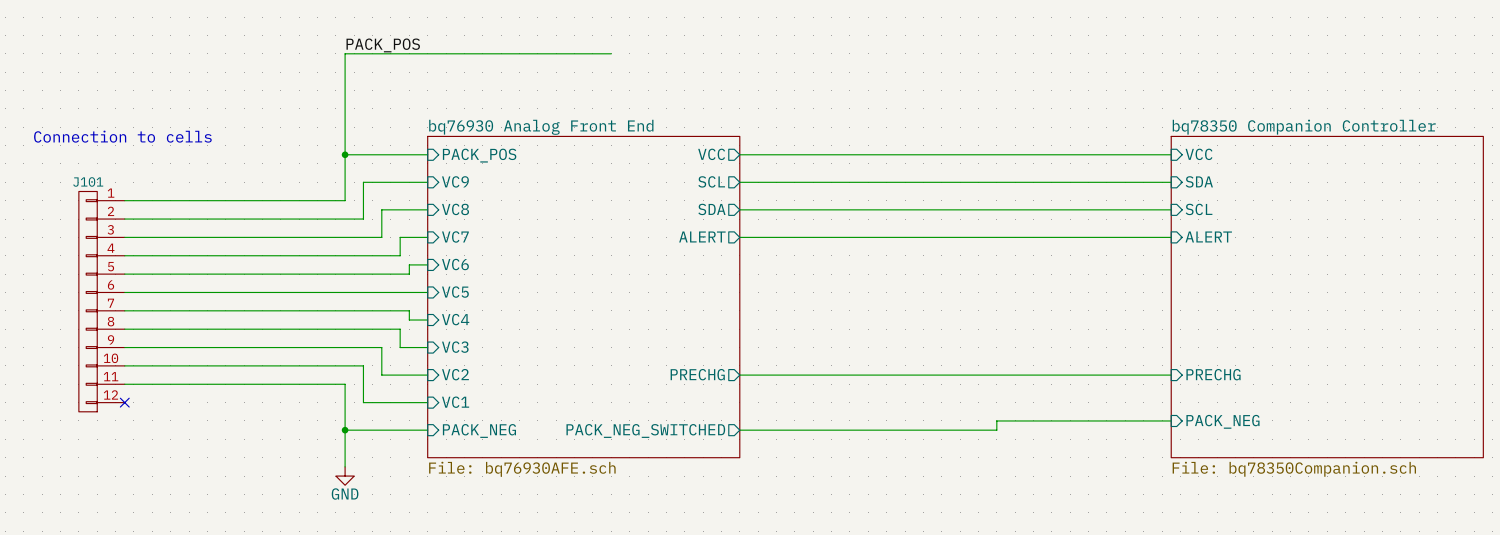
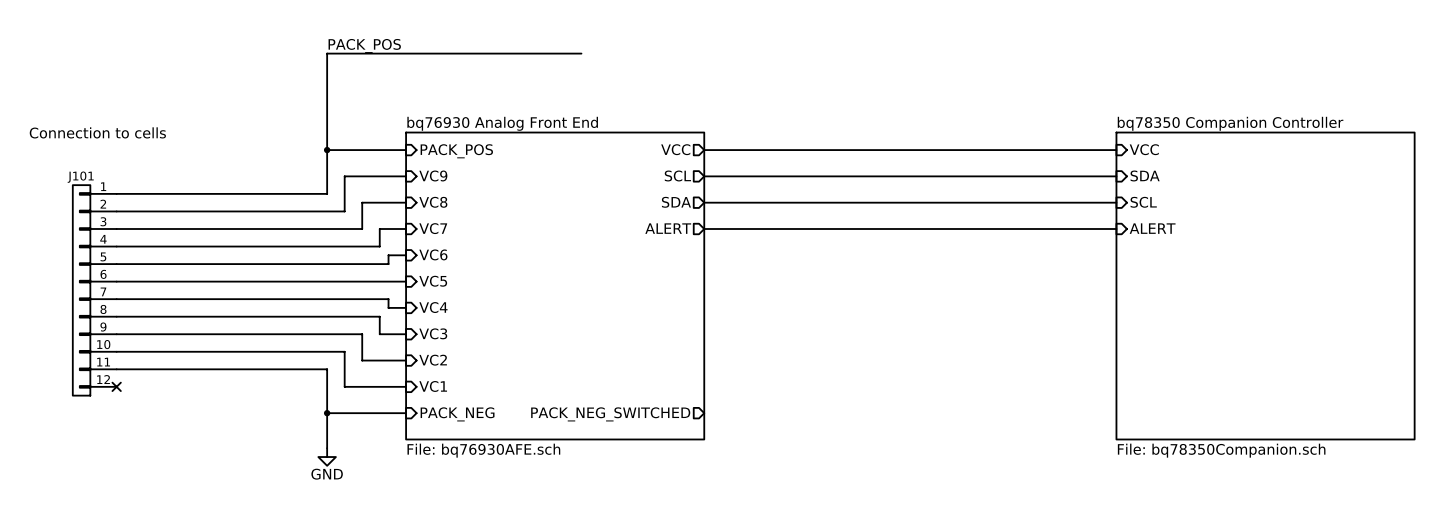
sheet pin: PRECHG (697, 374) -> none
sheet pin: PRECHG (1213, 374) -> none
wire: (739, 375) (1171, 375) -> none
wire: (1171, 420) (996, 420) (996, 430) (739, 430) -> none
sheet pin: PACK_NEG (1222, 421) -> none

